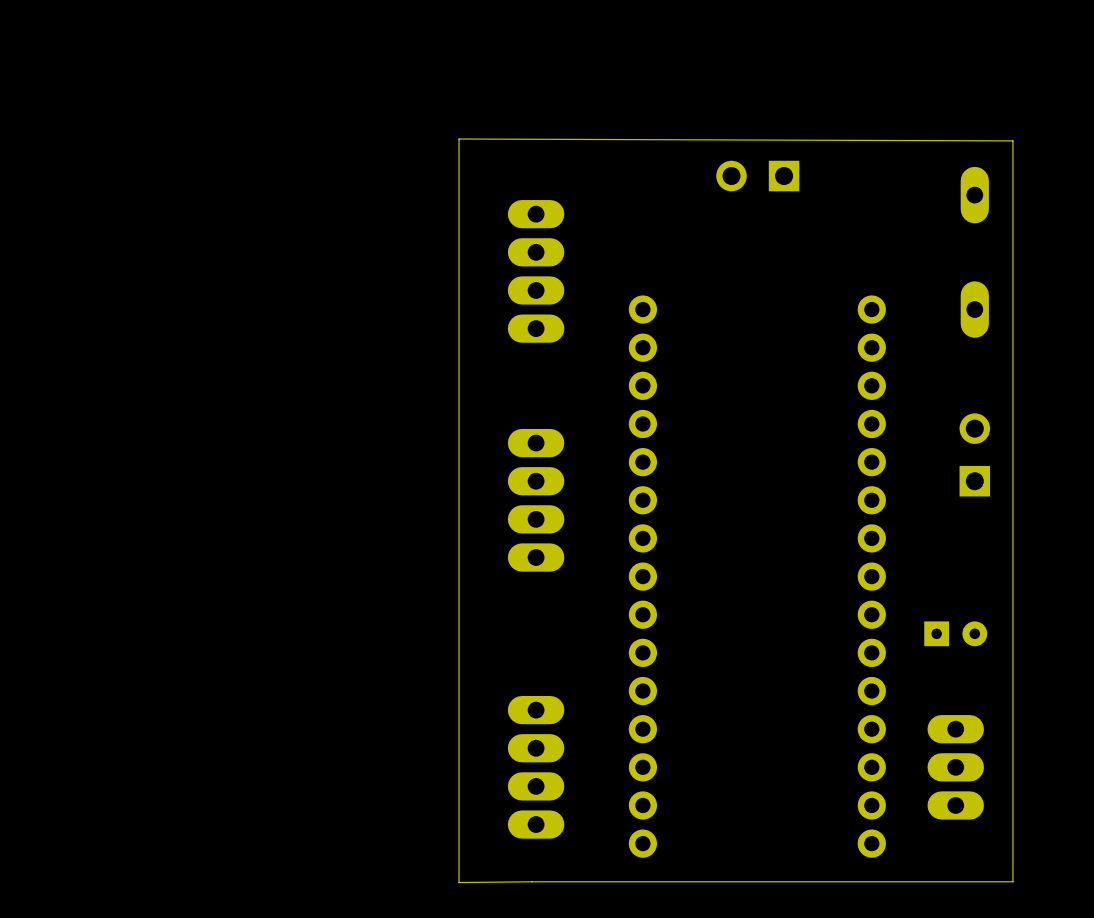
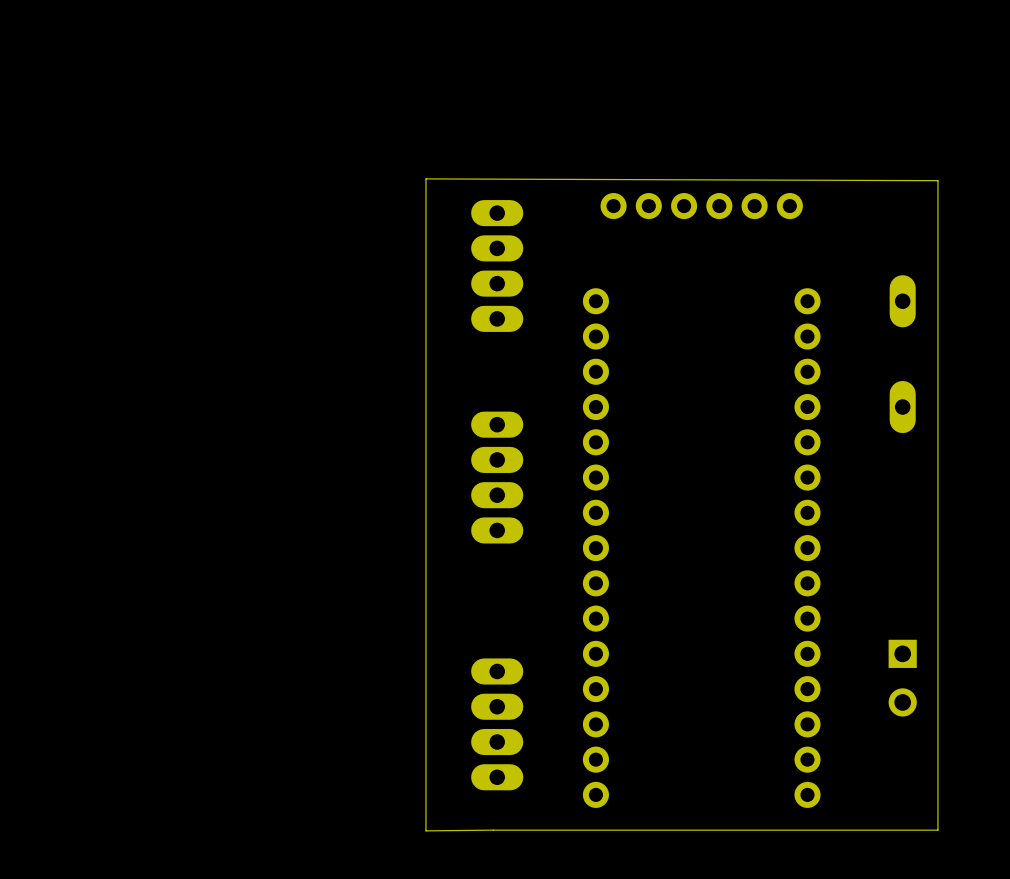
part: (757, 176) -> none
board edge: (459, 177) (459, 139) (1012, 140) (1012, 179) -> (425, 178) (937, 180)
part position: (974, 195) -> (902, 407)
part: none -> (701, 206)
part rotation: 0° (974, 454) -> 180° (902, 678)
part position: (974, 454) -> (902, 678)
part: (955, 633) -> none
part: (955, 767) -> none

